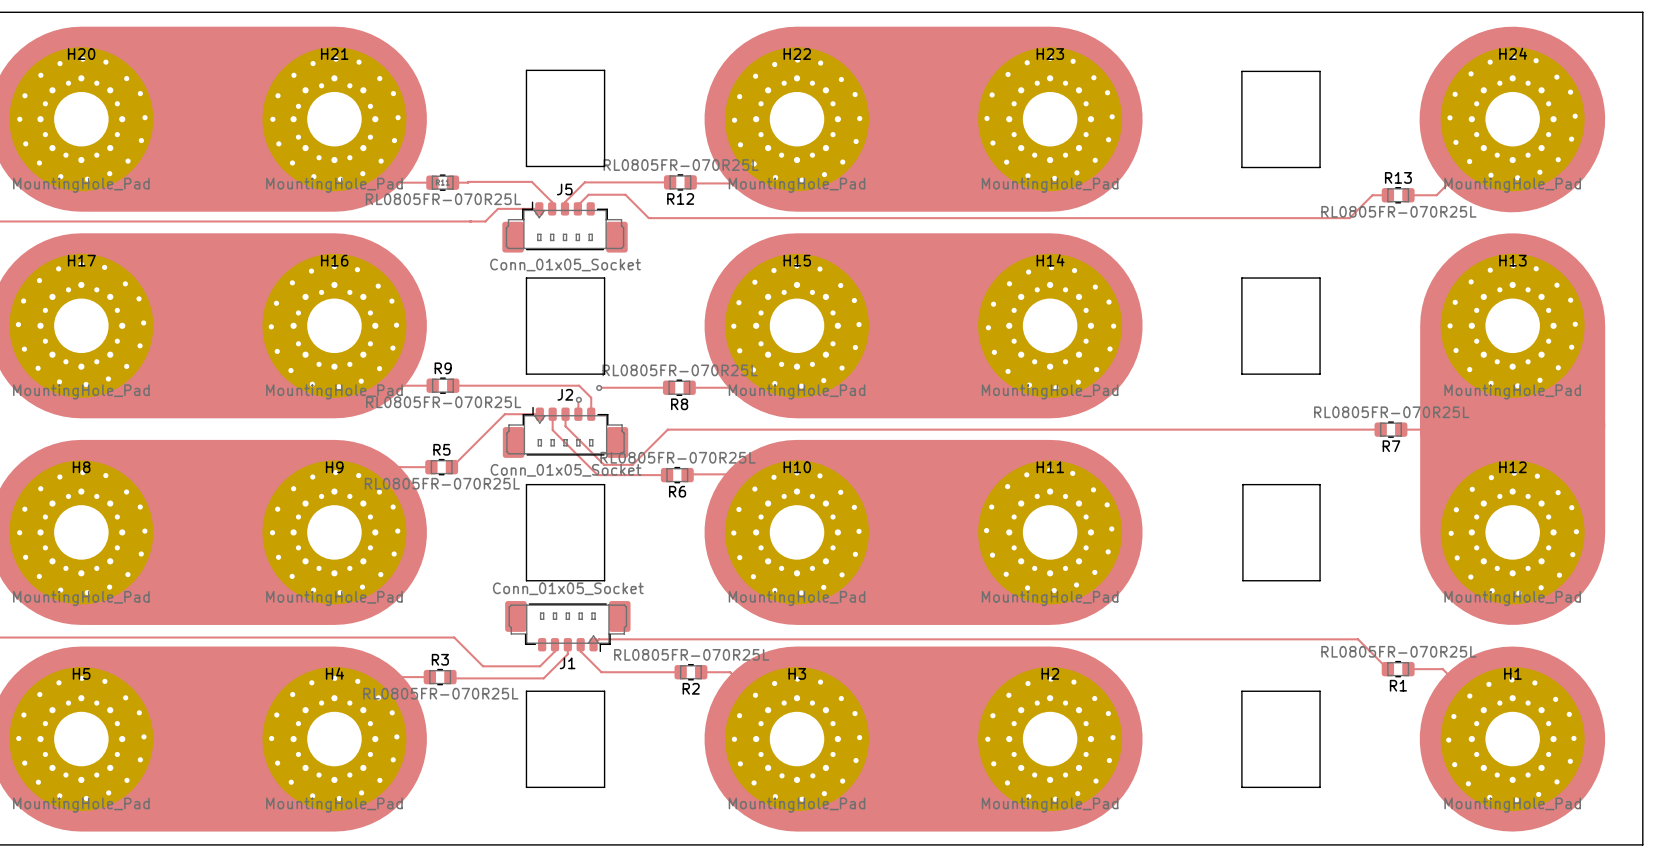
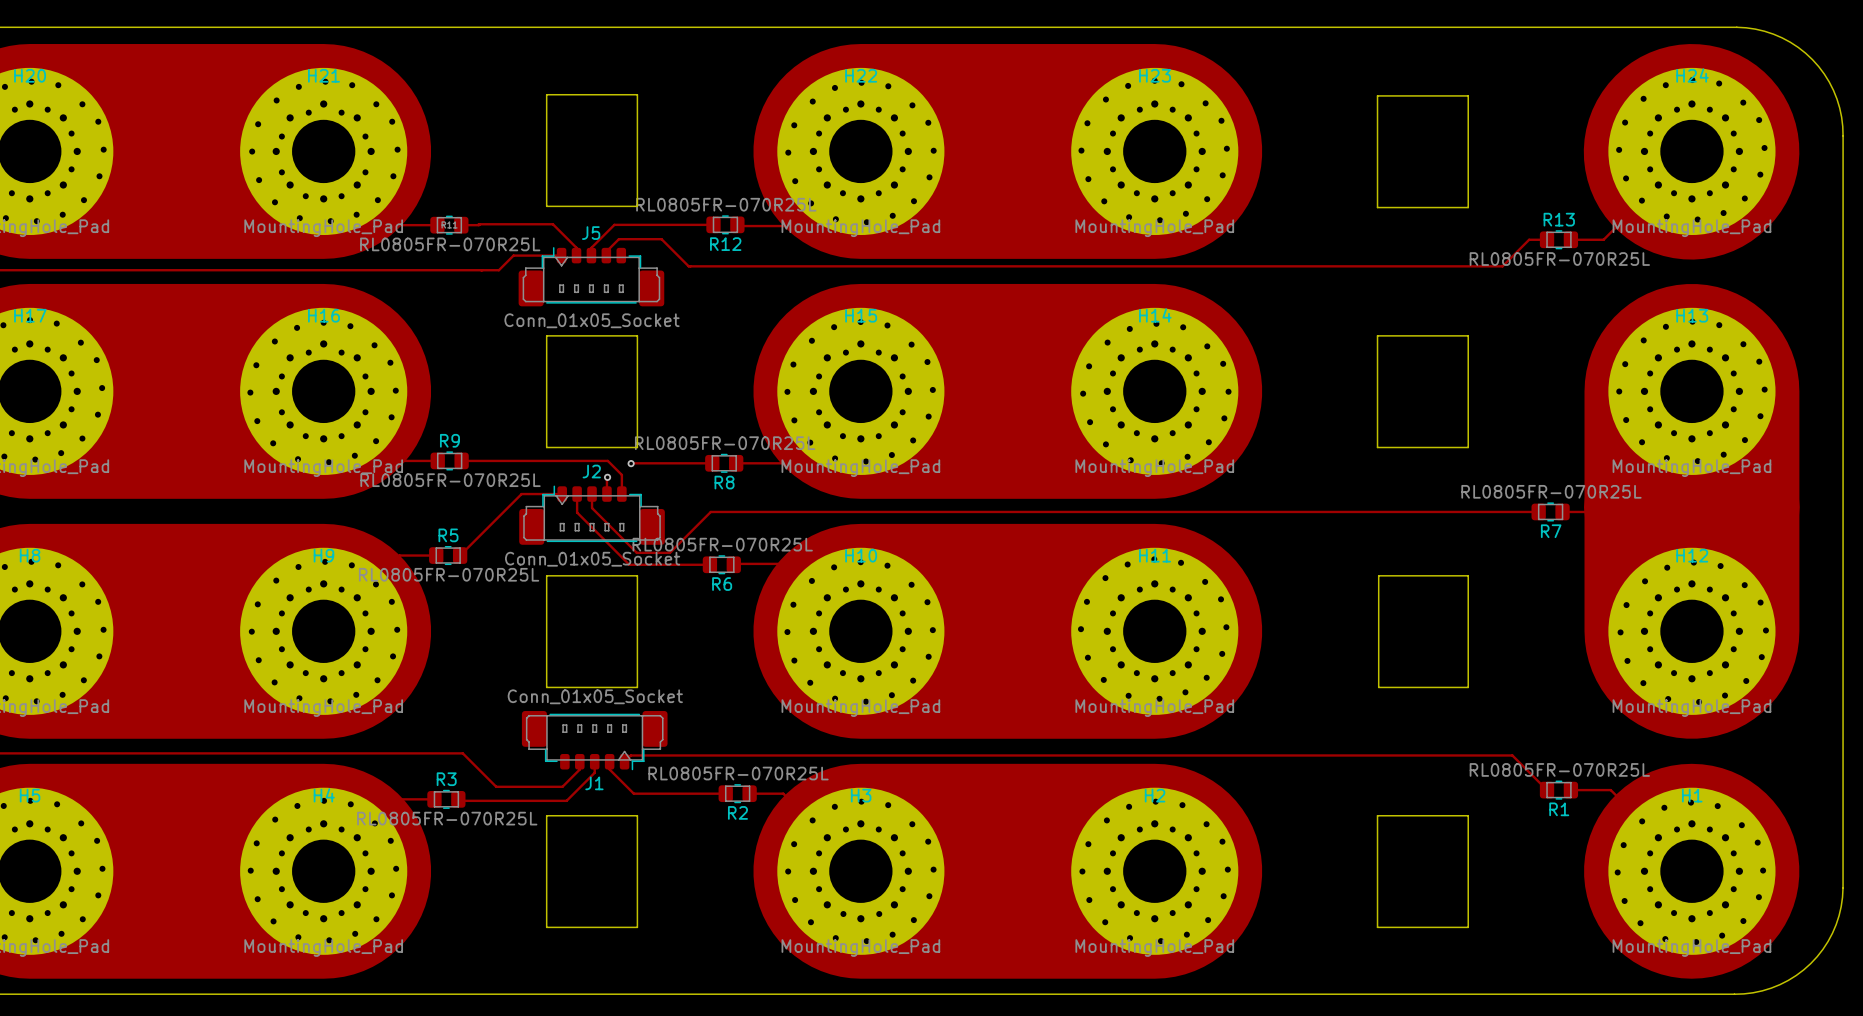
board edge: (1551, 12) (1642, 12) (1642, 105) -> (1736, 27) (1764, 31) (1782, 37) (1798, 47) (1812, 59) (1824, 74) (1836, 99) (1841, 117) (1843, 135)
board edge: (1642, 753) (1642, 844) (1549, 844) -> (1843, 887) (1841, 906) (1832, 933) (1822, 949) (1810, 963) (1788, 980) (1771, 988) (1753, 992) (1734, 994)

